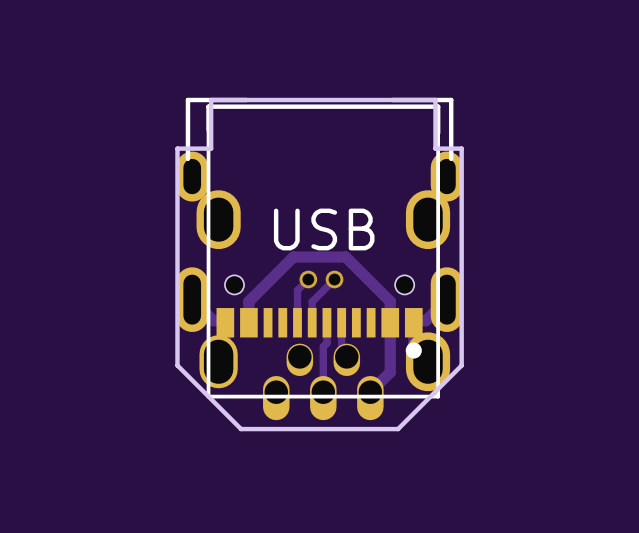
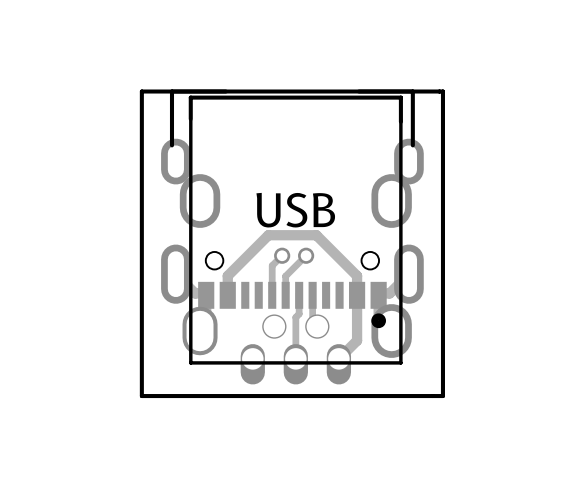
board edge: (211, 100) (211, 148) (177, 148) (177, 365) (241, 429) (398, 429) (461, 365) (461, 148) (435, 148) (435, 100) -> (193, 91) (141, 91) (141, 396) (442, 396) (442, 91) (398, 91)
part footprint: [196, 104, 451, 421] -> [179, 95, 412, 385]

